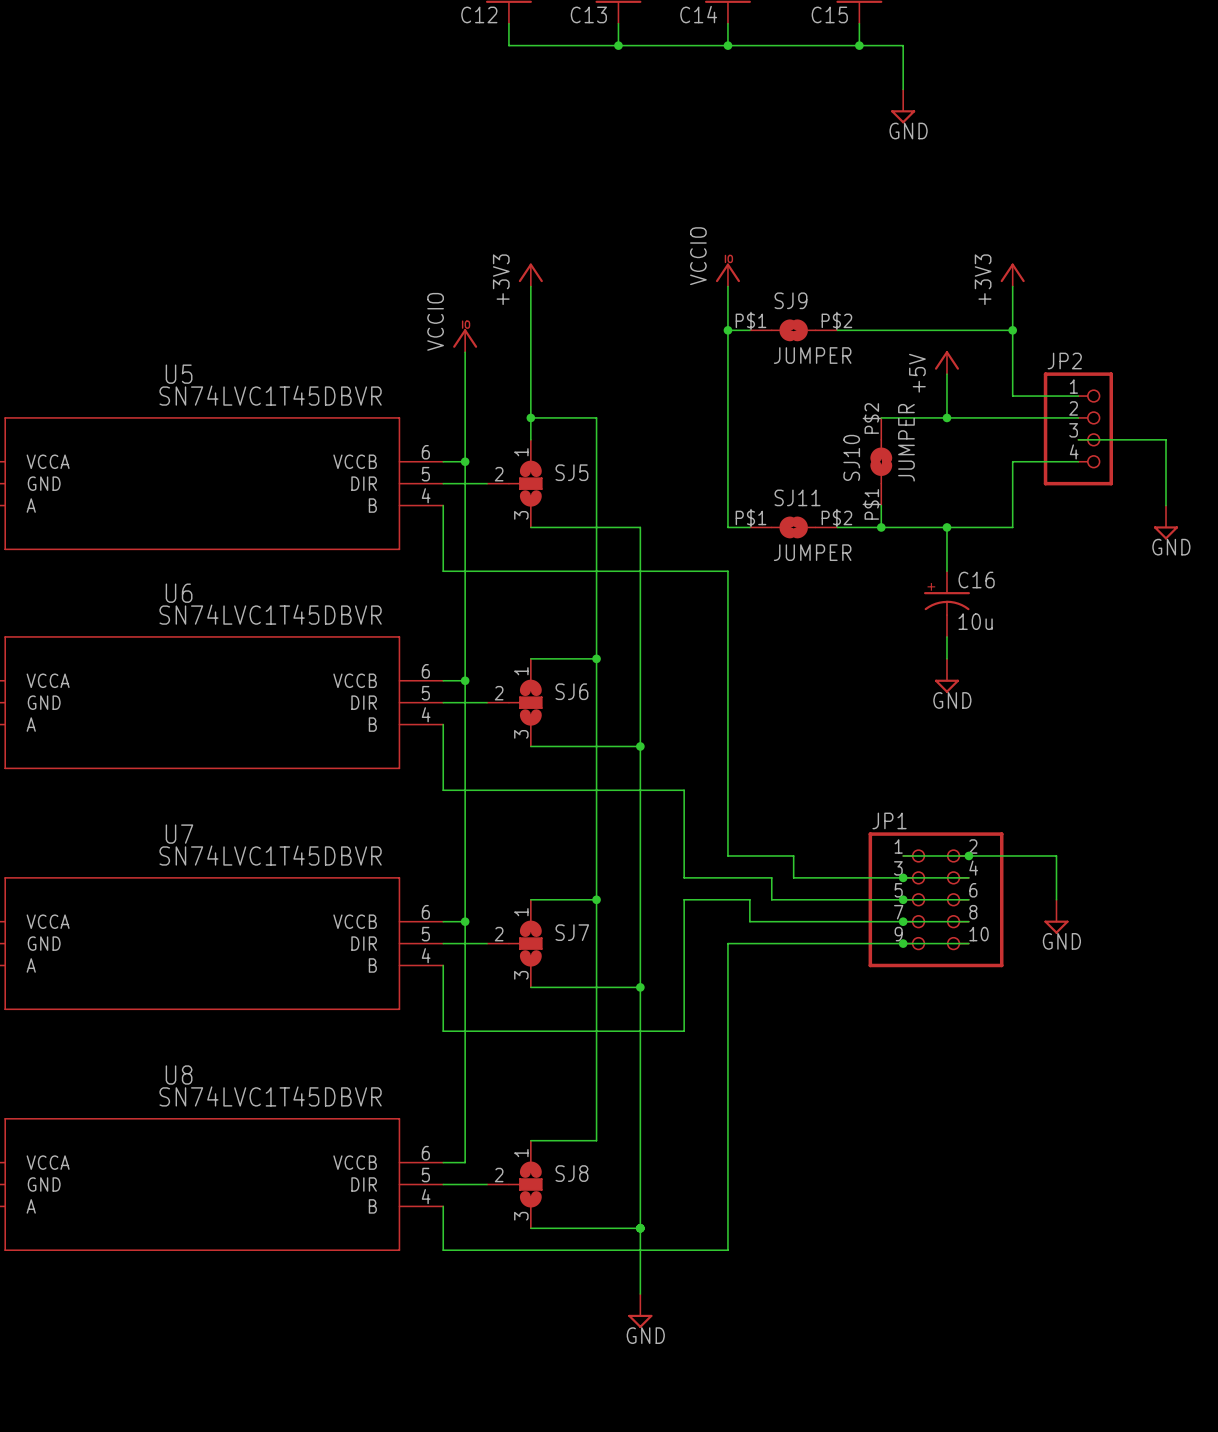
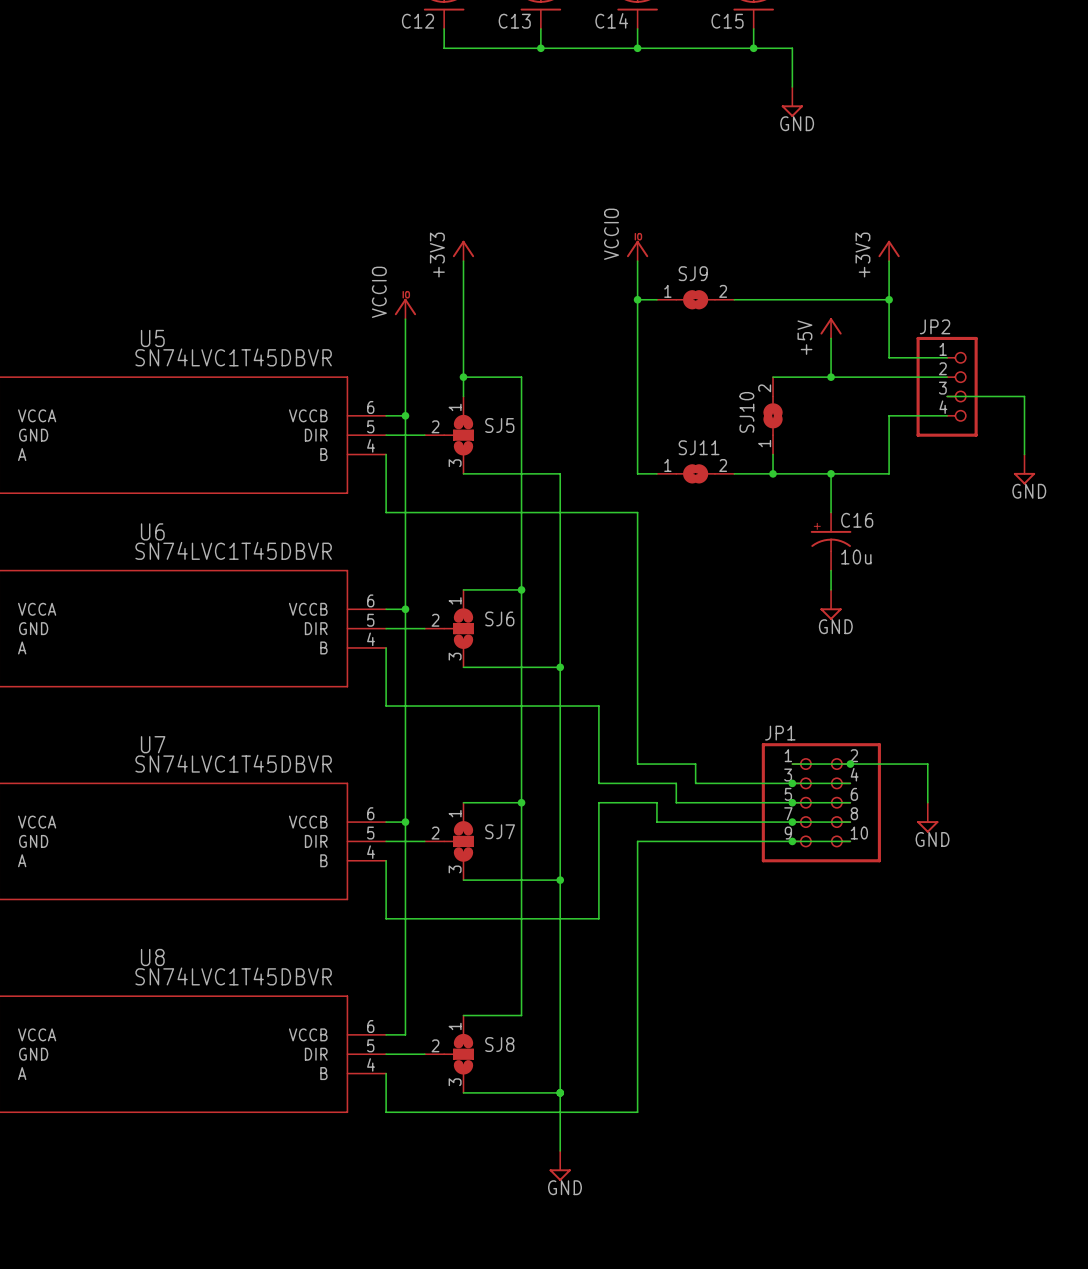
SJ9 pin number: P$1 (750, 320) -> 1 (667, 291)
SJ9 pin number: P$2 (836, 320) -> 2 (723, 291)
SJ9 value: JUMPER (812, 355) -> none
SJ10 pin number: P$2 (871, 418) -> 2 (764, 388)
SJ10 value: JUMPER (906, 442) -> none
SJ10 pin number: P$1 (871, 504) -> 1 (764, 443)
SJ11 pin number: P$1 (750, 517) -> 1 (667, 465)
SJ11 pin number: P$2 (836, 517) -> 2 (723, 465)
SJ11 value: JUMPER (812, 552) -> none

